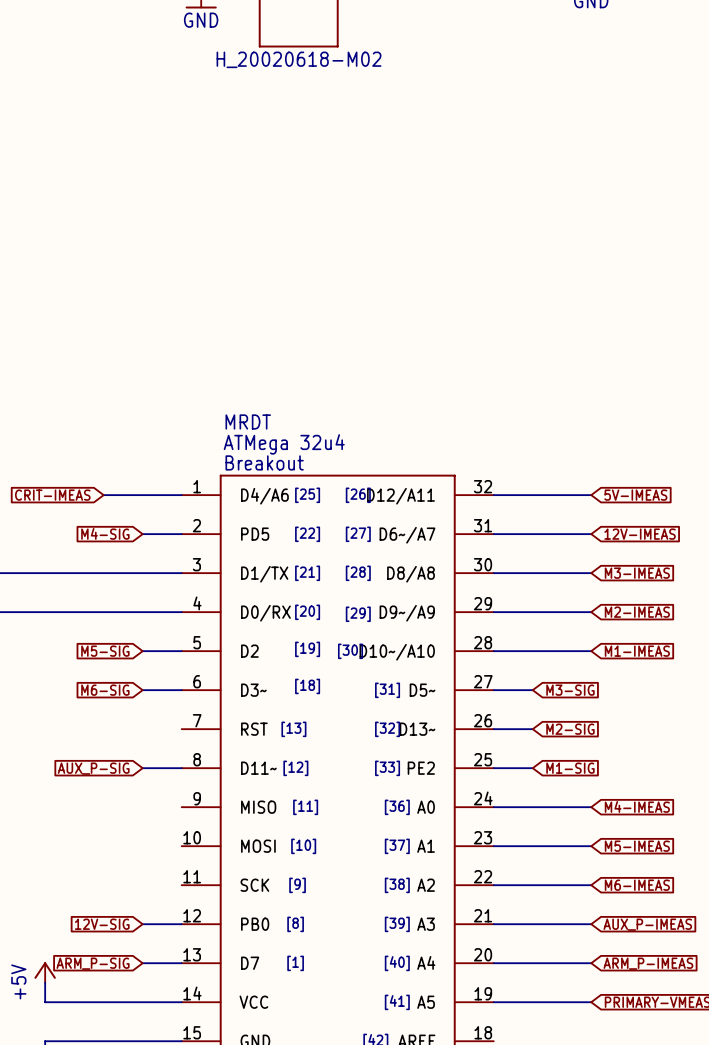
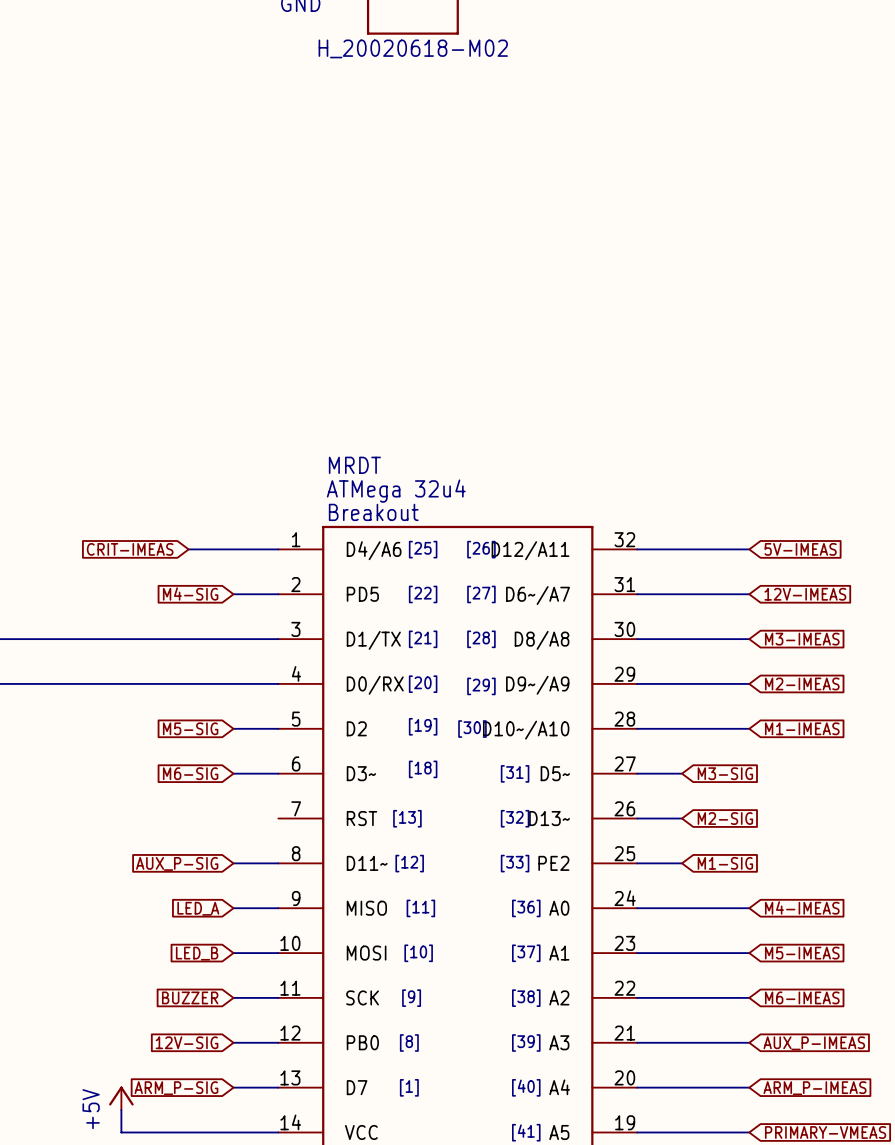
global label: none -> LED_A (198, 908)
wire: none -> (233, 908) (278, 908)
global label: none -> LED_B (197, 953)
wire: none -> (233, 953) (278, 953)
global label: none -> BUZZER (190, 997)
wire: none -> (233, 997) (278, 997)

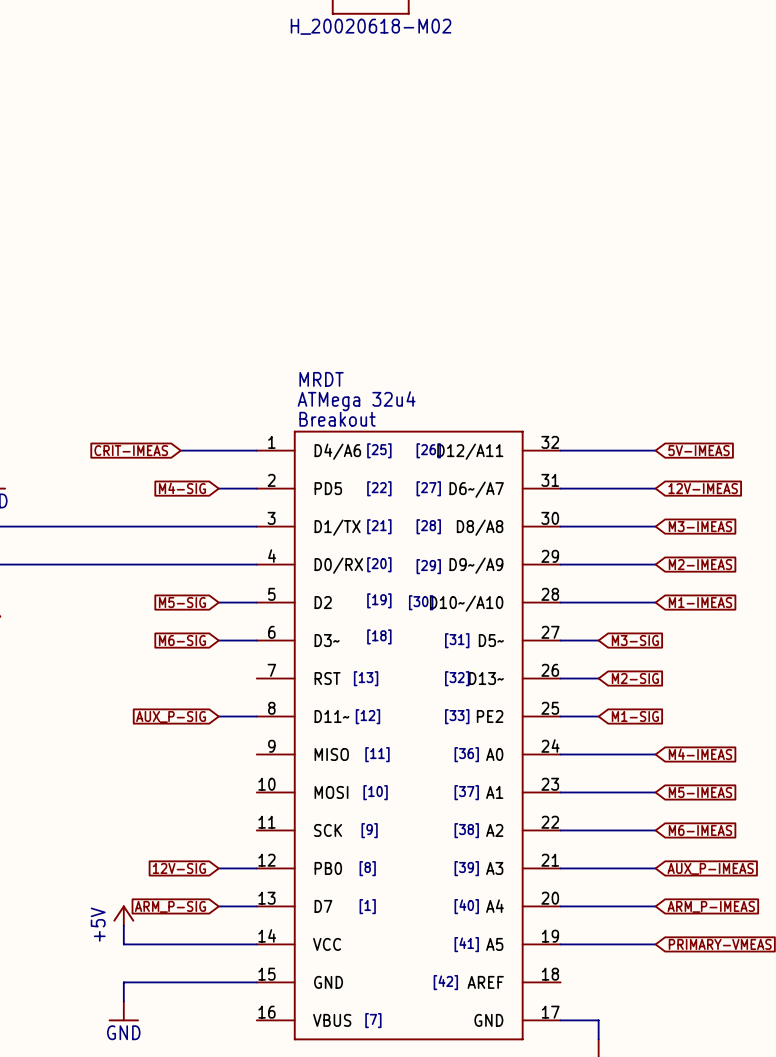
global label: LED_A (198, 908) -> none
wire: (233, 908) (278, 908) -> none
global label: LED_B (197, 953) -> none
wire: (233, 953) (278, 953) -> none
global label: BUZZER (190, 997) -> none
wire: (233, 997) (278, 997) -> none

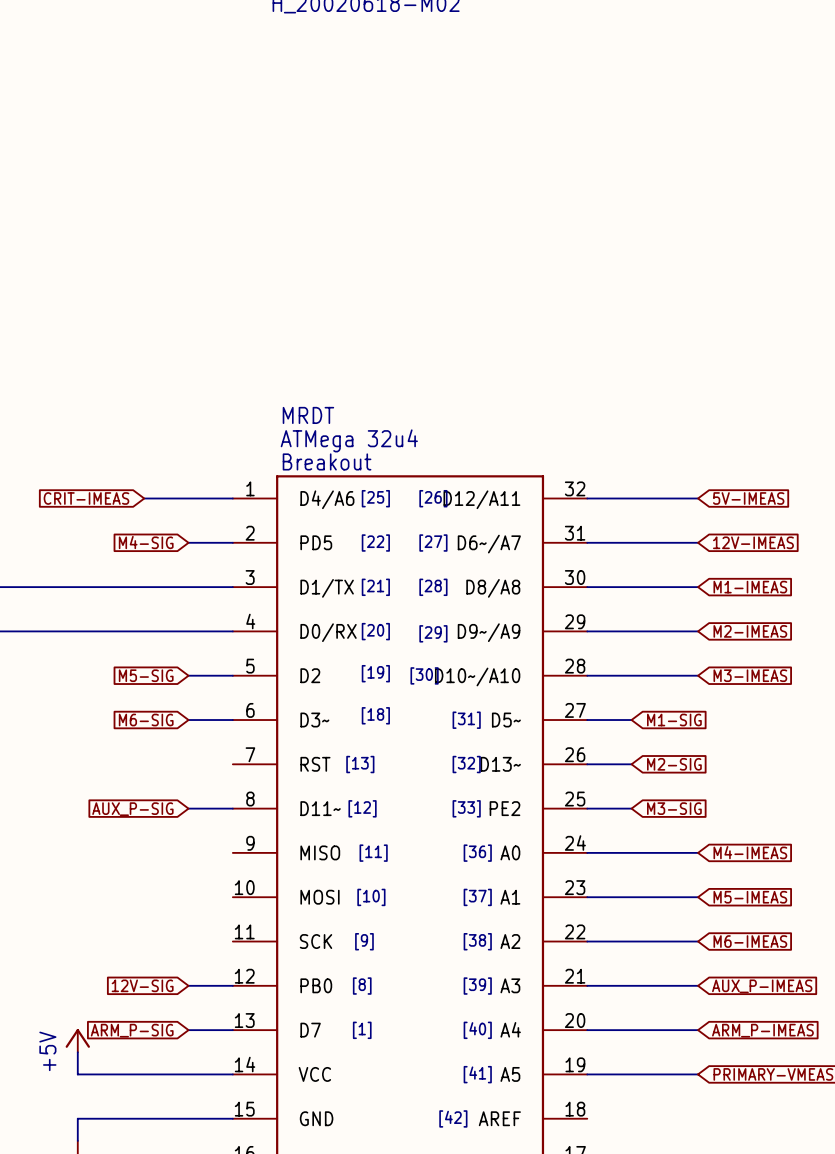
global label: M3-IMEAS (700, 526) -> M1-IMEAS (750, 587)
global label: M1-IMEAS (700, 602) -> M3-IMEAS (750, 675)
global label: M3-SIG (635, 640) -> M1-SIG (674, 720)
global label: M1-SIG (635, 716) -> M3-SIG (674, 808)

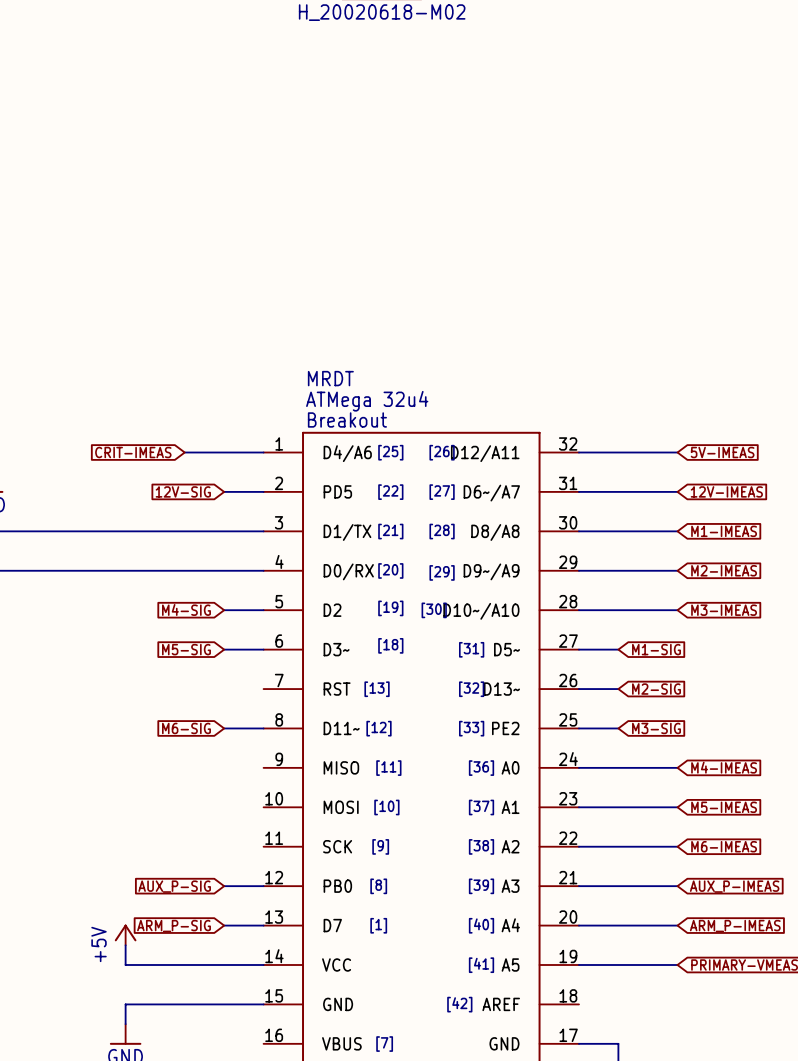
global label: M4-SIG (146, 542) -> 12V-SIG (183, 491)
global label: M5-SIG (146, 675) -> M4-SIG (186, 609)
global label: M6-SIG (146, 720) -> M5-SIG (186, 649)
global label: AUX_P-SIG (132, 809) -> M6-SIG (186, 728)
global label: 12V-SIG (142, 985) -> AUX_P-SIG (174, 886)

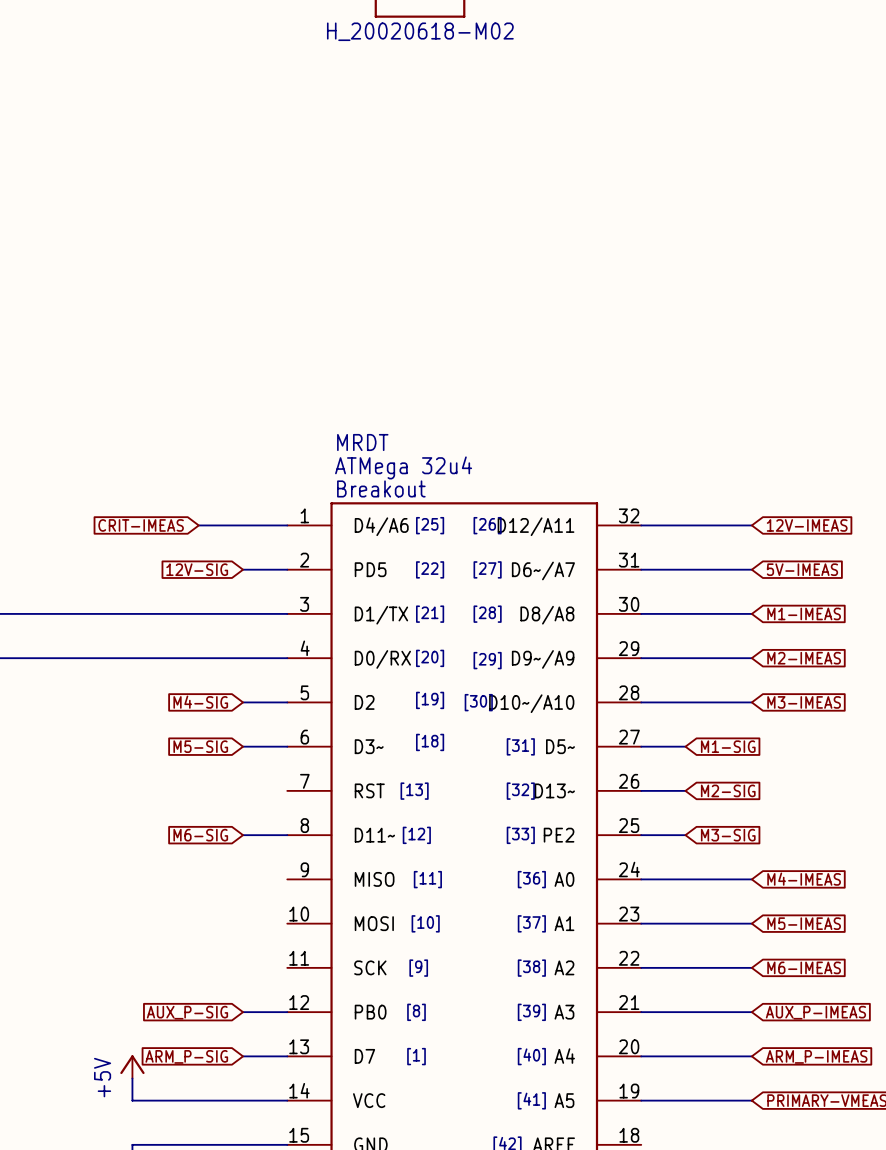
global label: 5V-IMEAS (722, 452) -> 12V-IMEAS (807, 525)
global label: 12V-IMEAS (726, 491) -> 5V-IMEAS (802, 569)

